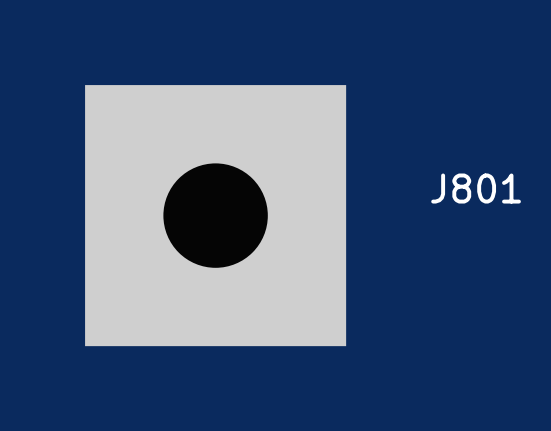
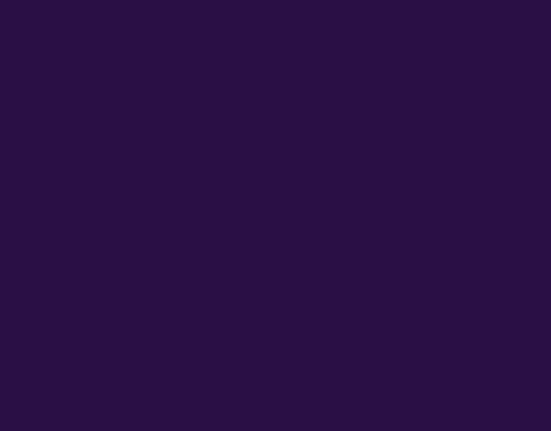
J801: (215, 215) -> none

